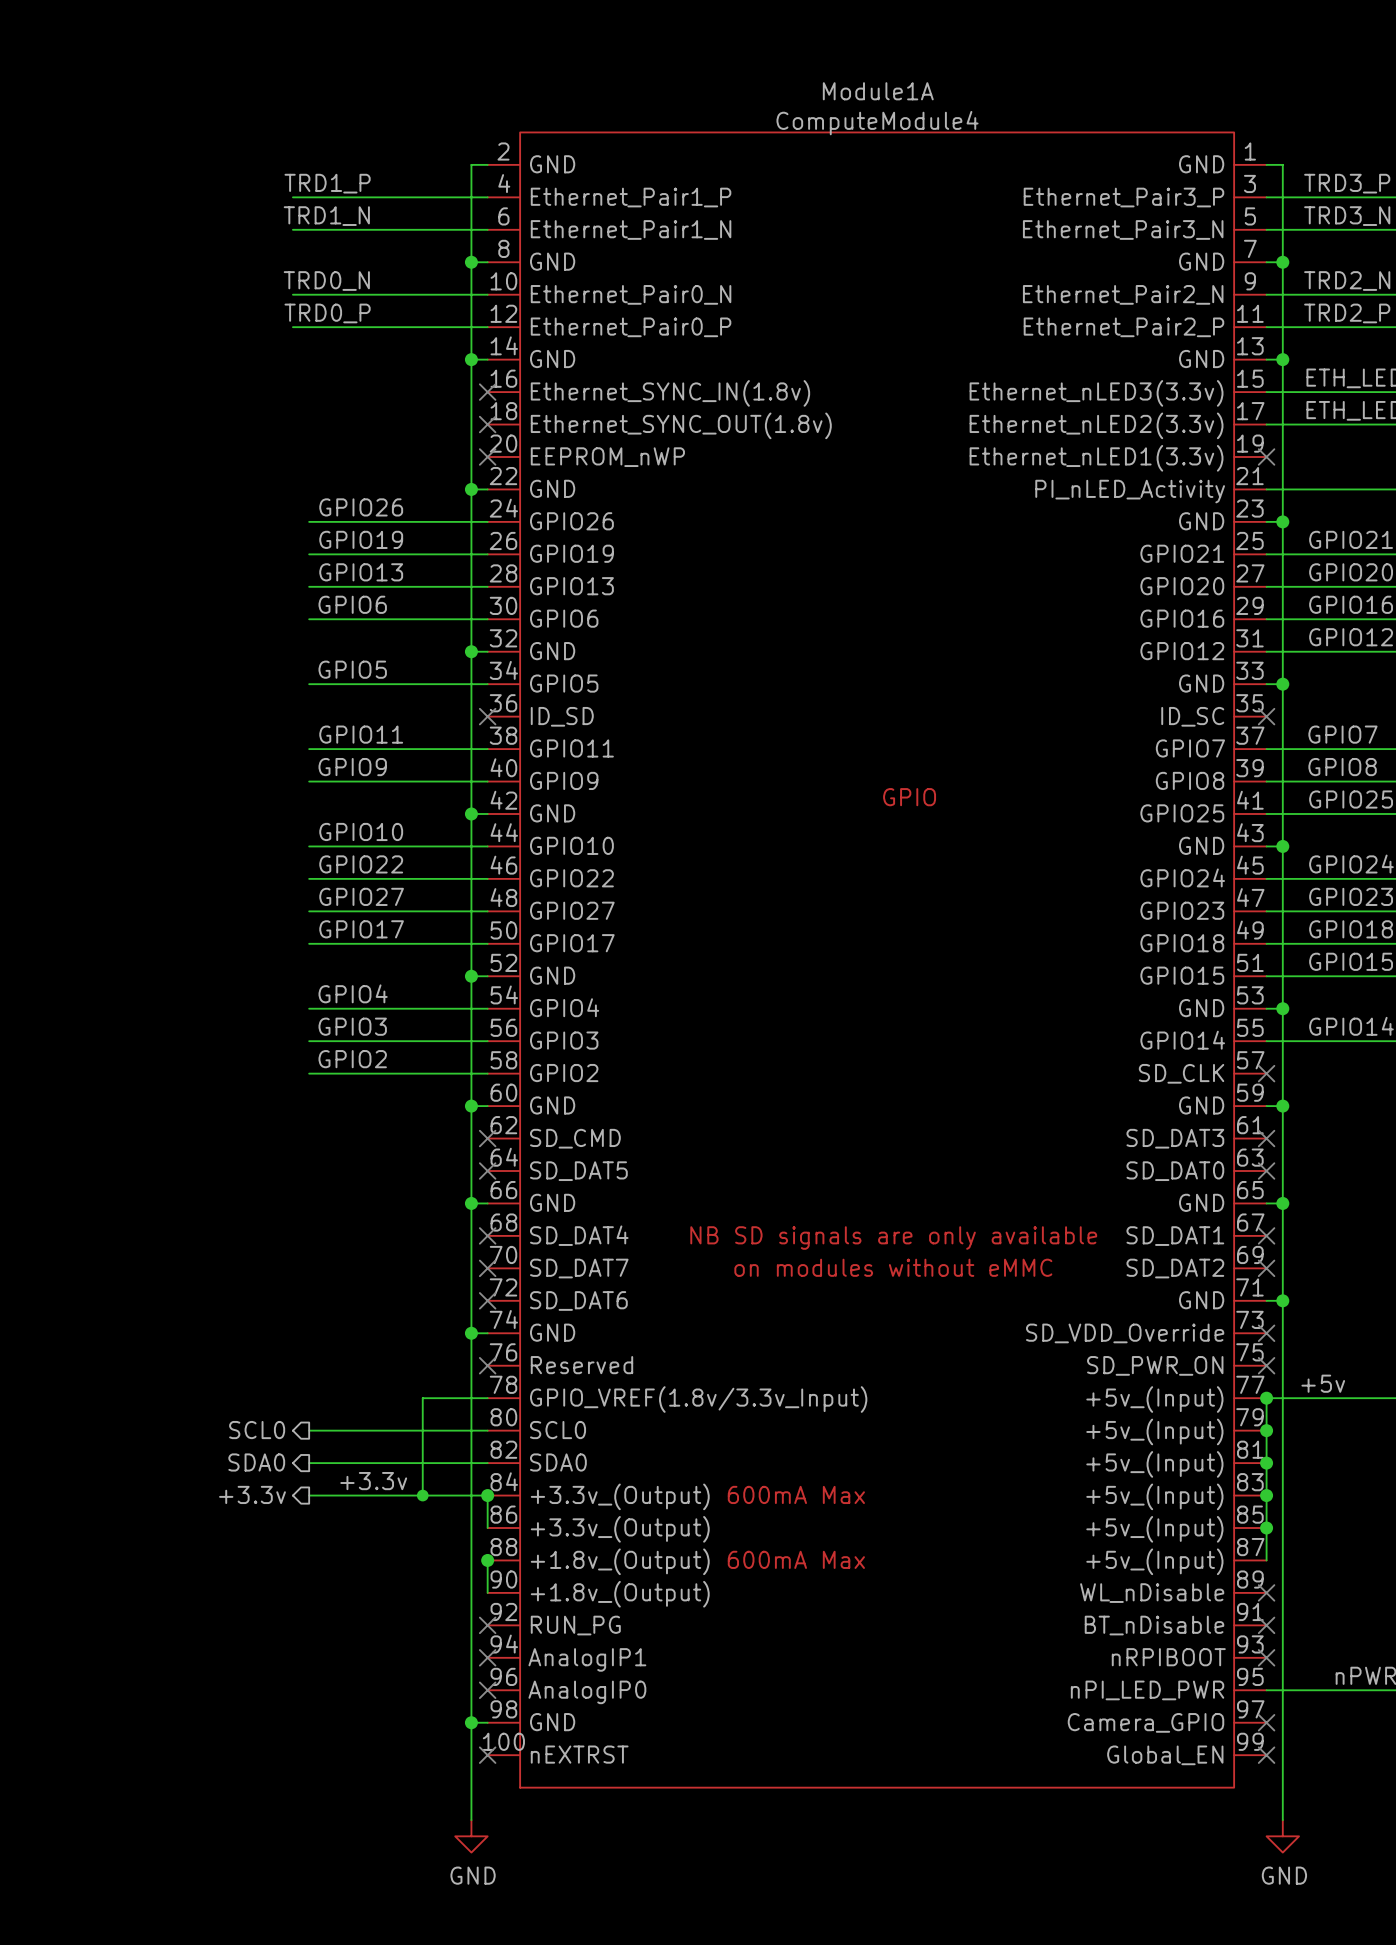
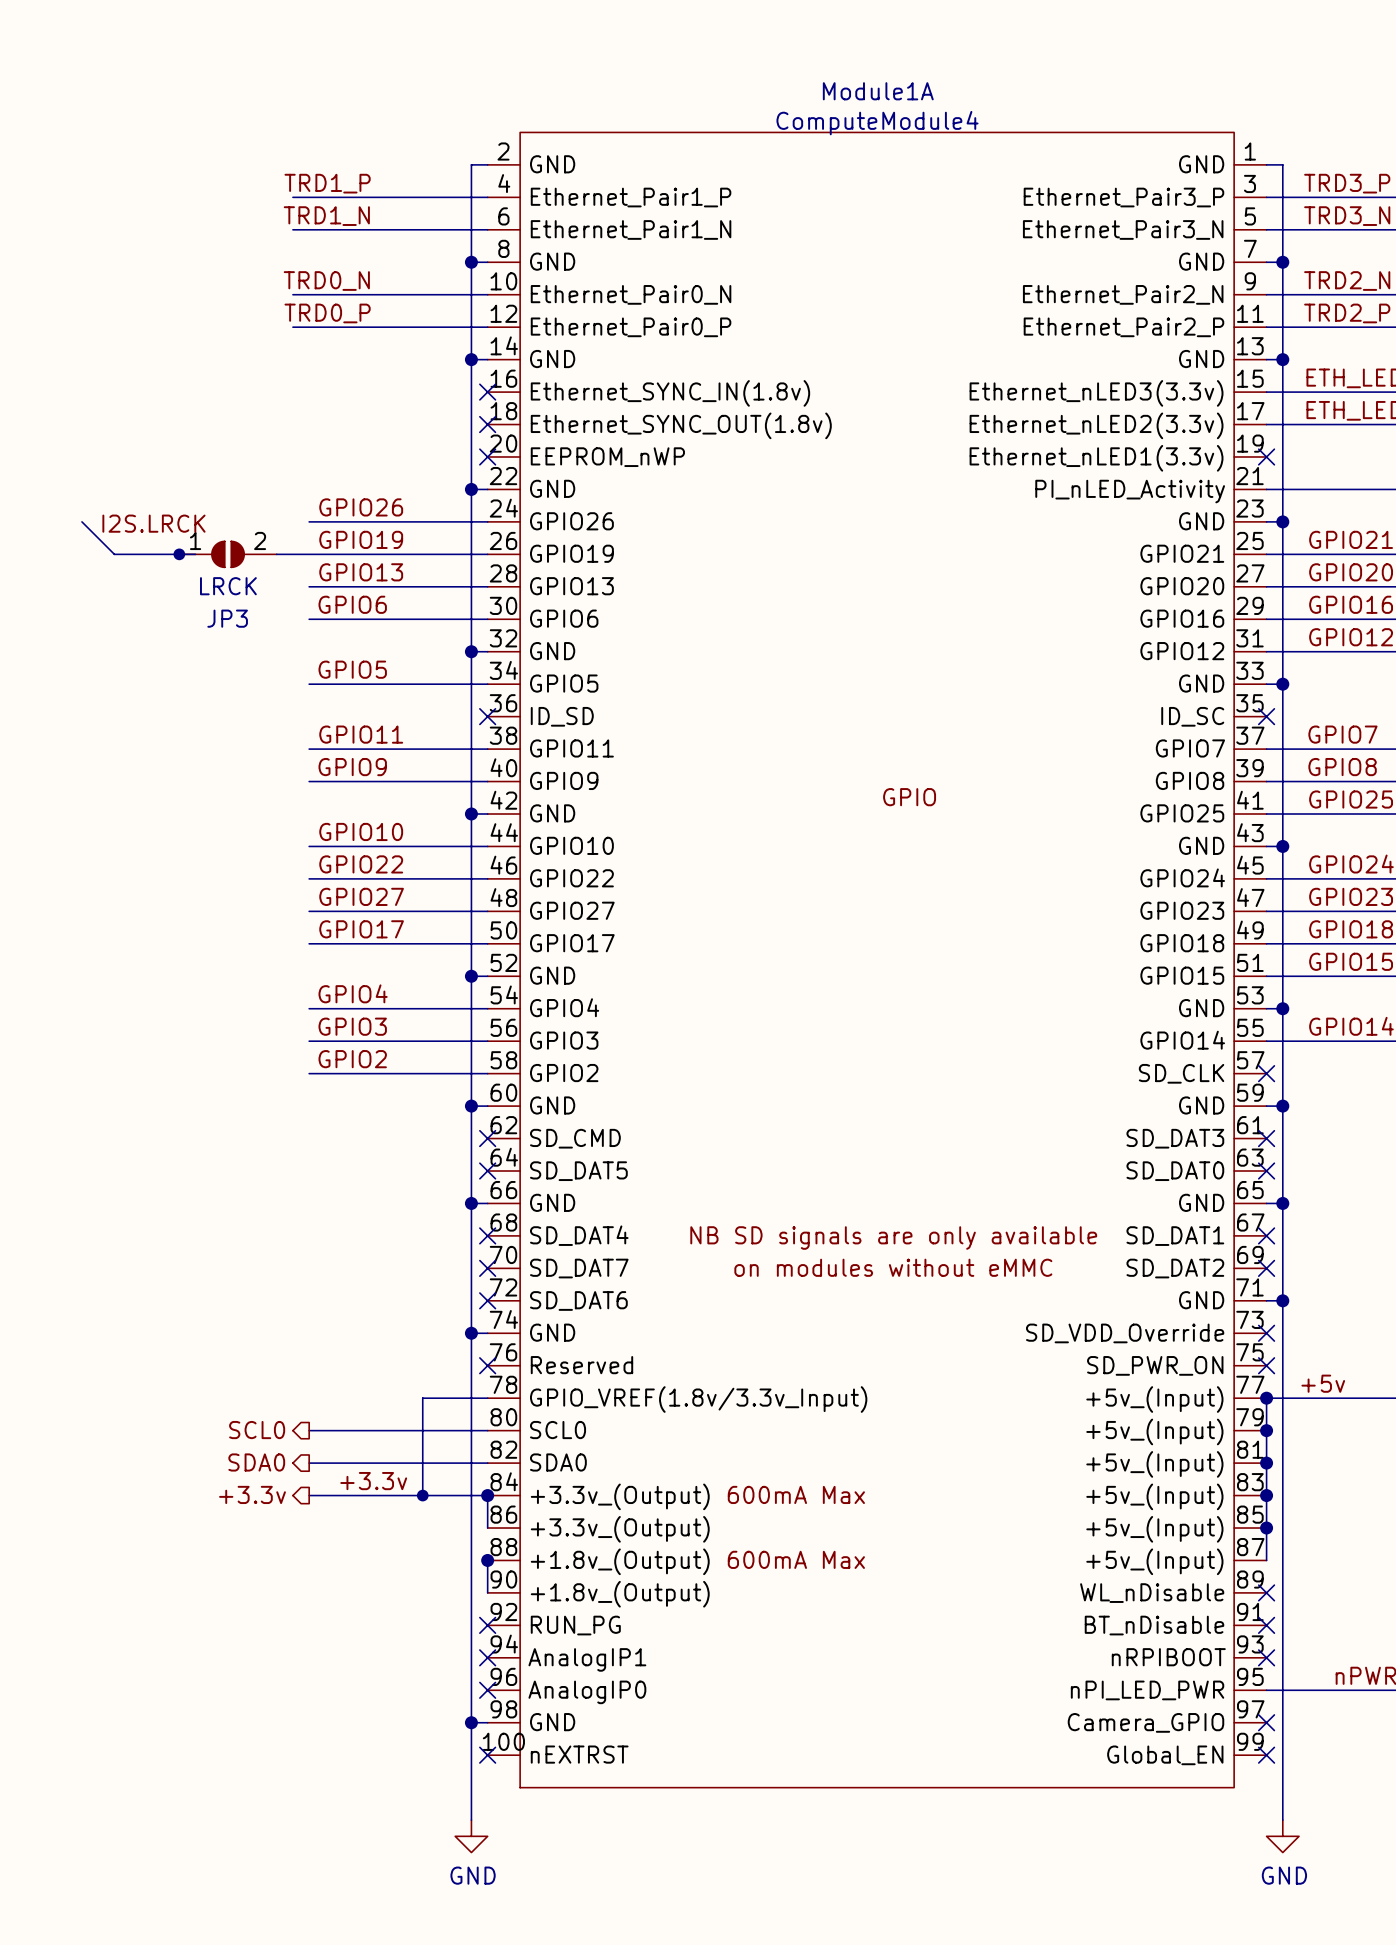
wire: none -> (81, 521) (114, 554) (195, 554)
label: none -> I2S.LRCK (153, 523)
junction: none -> (179, 554)
JP3: none -> LRCK (228, 554)
wire: none -> (276, 554) (309, 554)

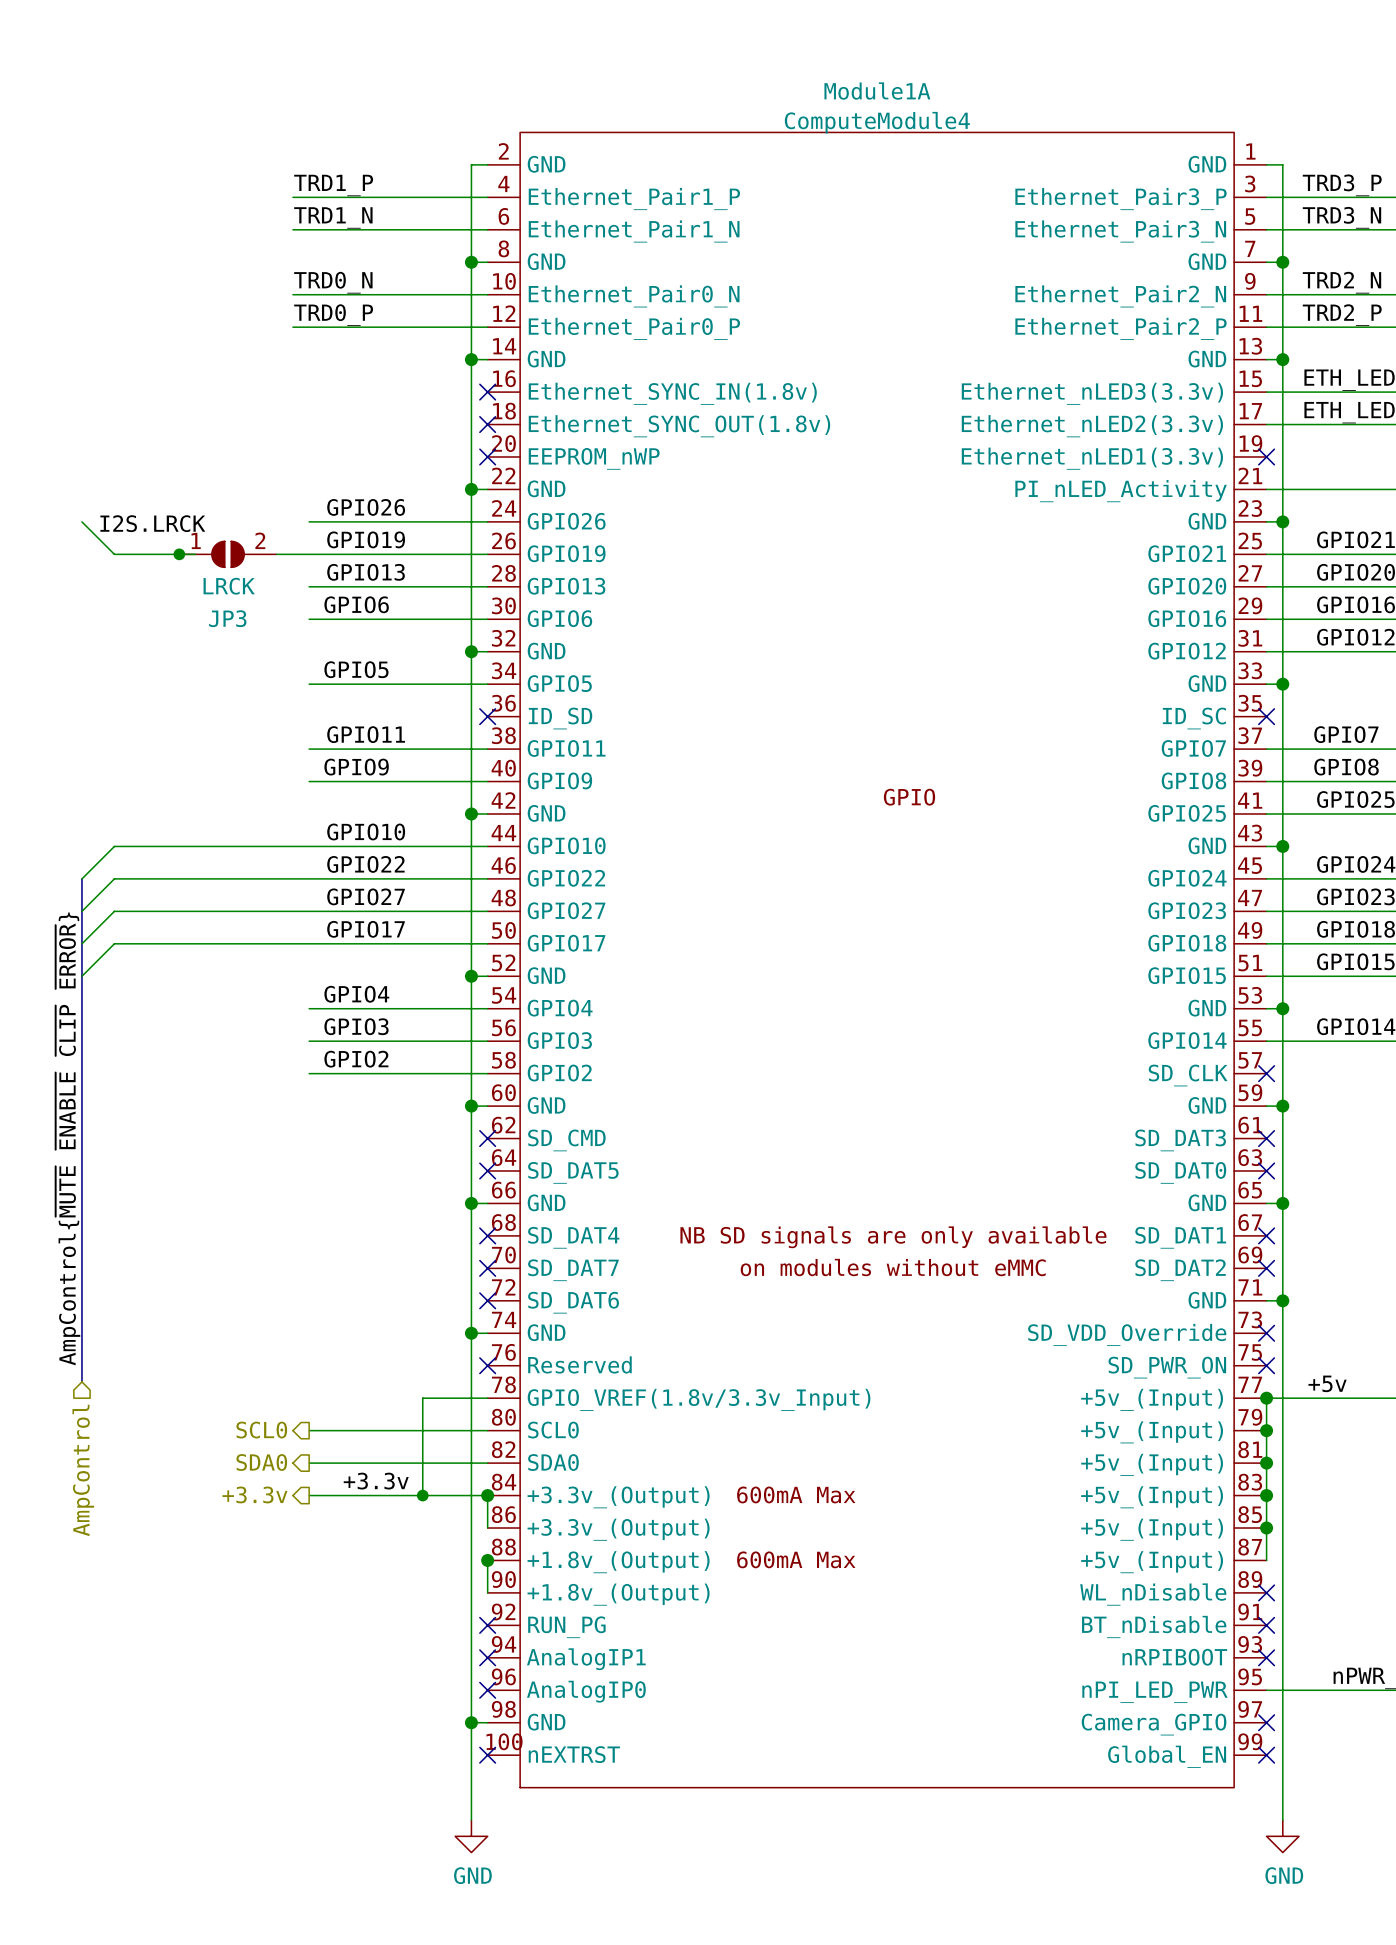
wire: none -> (309, 846) (114, 846) (81, 878)
bus: none -> (81, 878) (81, 1381)
wire: none -> (309, 878) (114, 878) (81, 911)
wire: none -> (309, 911) (114, 911) (81, 943)
wire: none -> (309, 943) (114, 943) (81, 976)
label: none -> AmpControl{~{MUTE} ~{ENABLE} ~{CLIP} ~{ERROR}} (67, 1138)
hierarchical label: none -> AmpControl (83, 1470)

